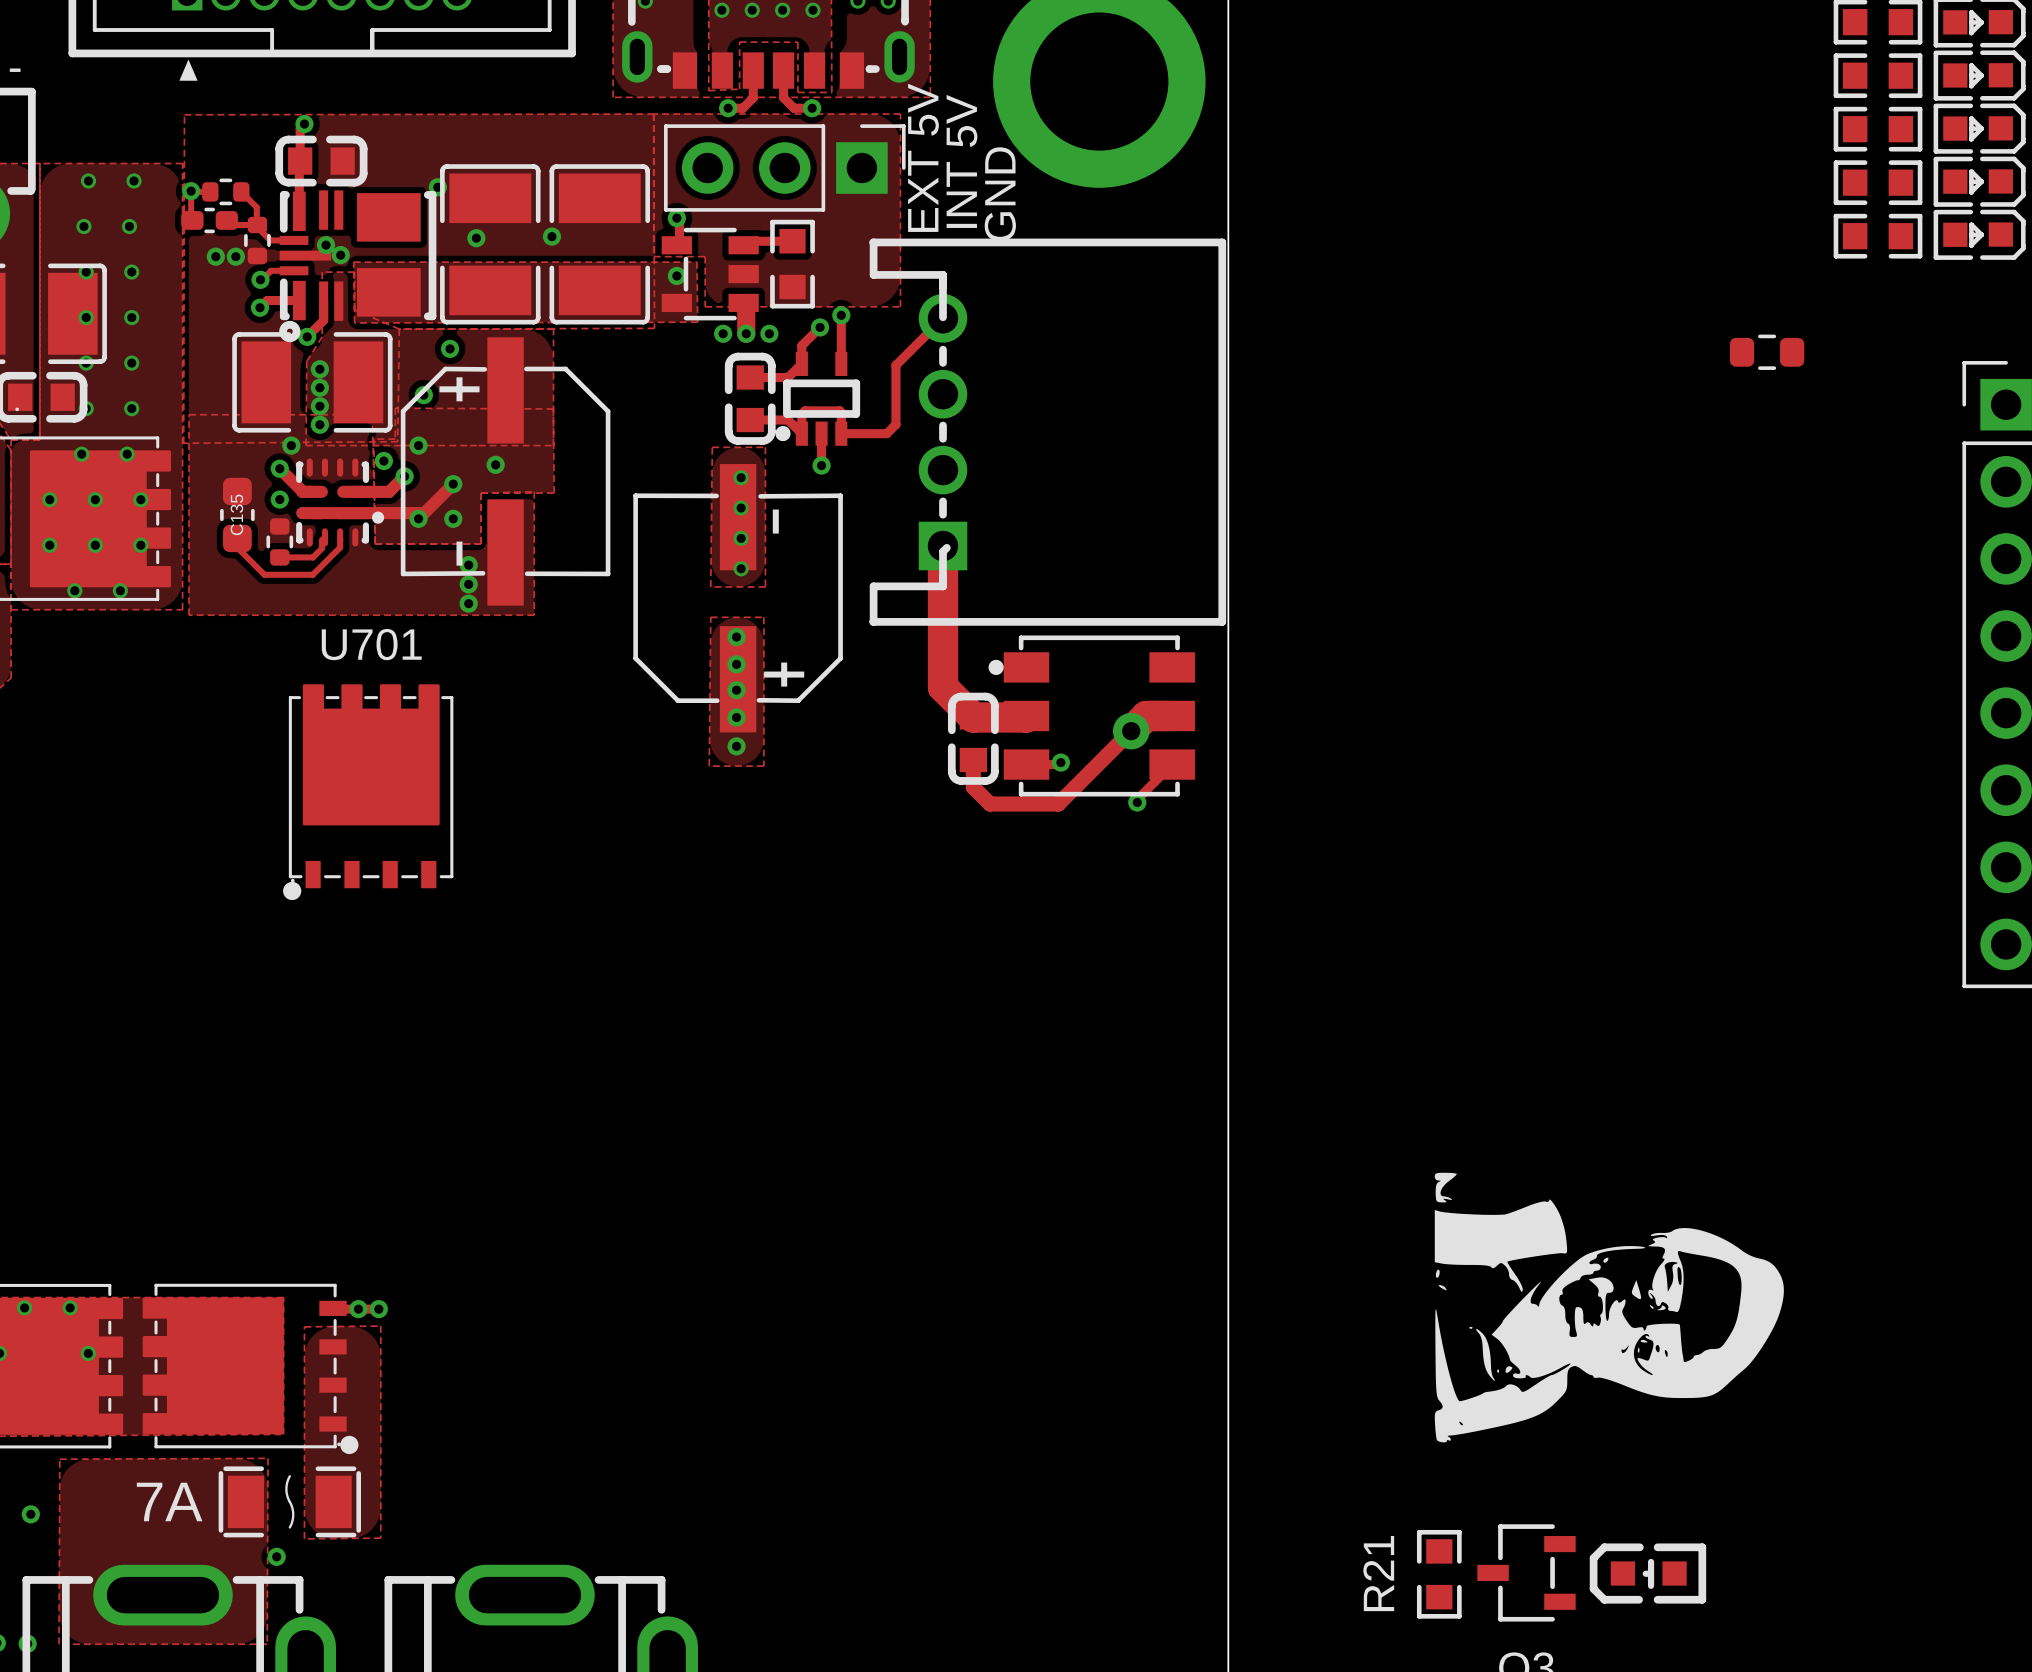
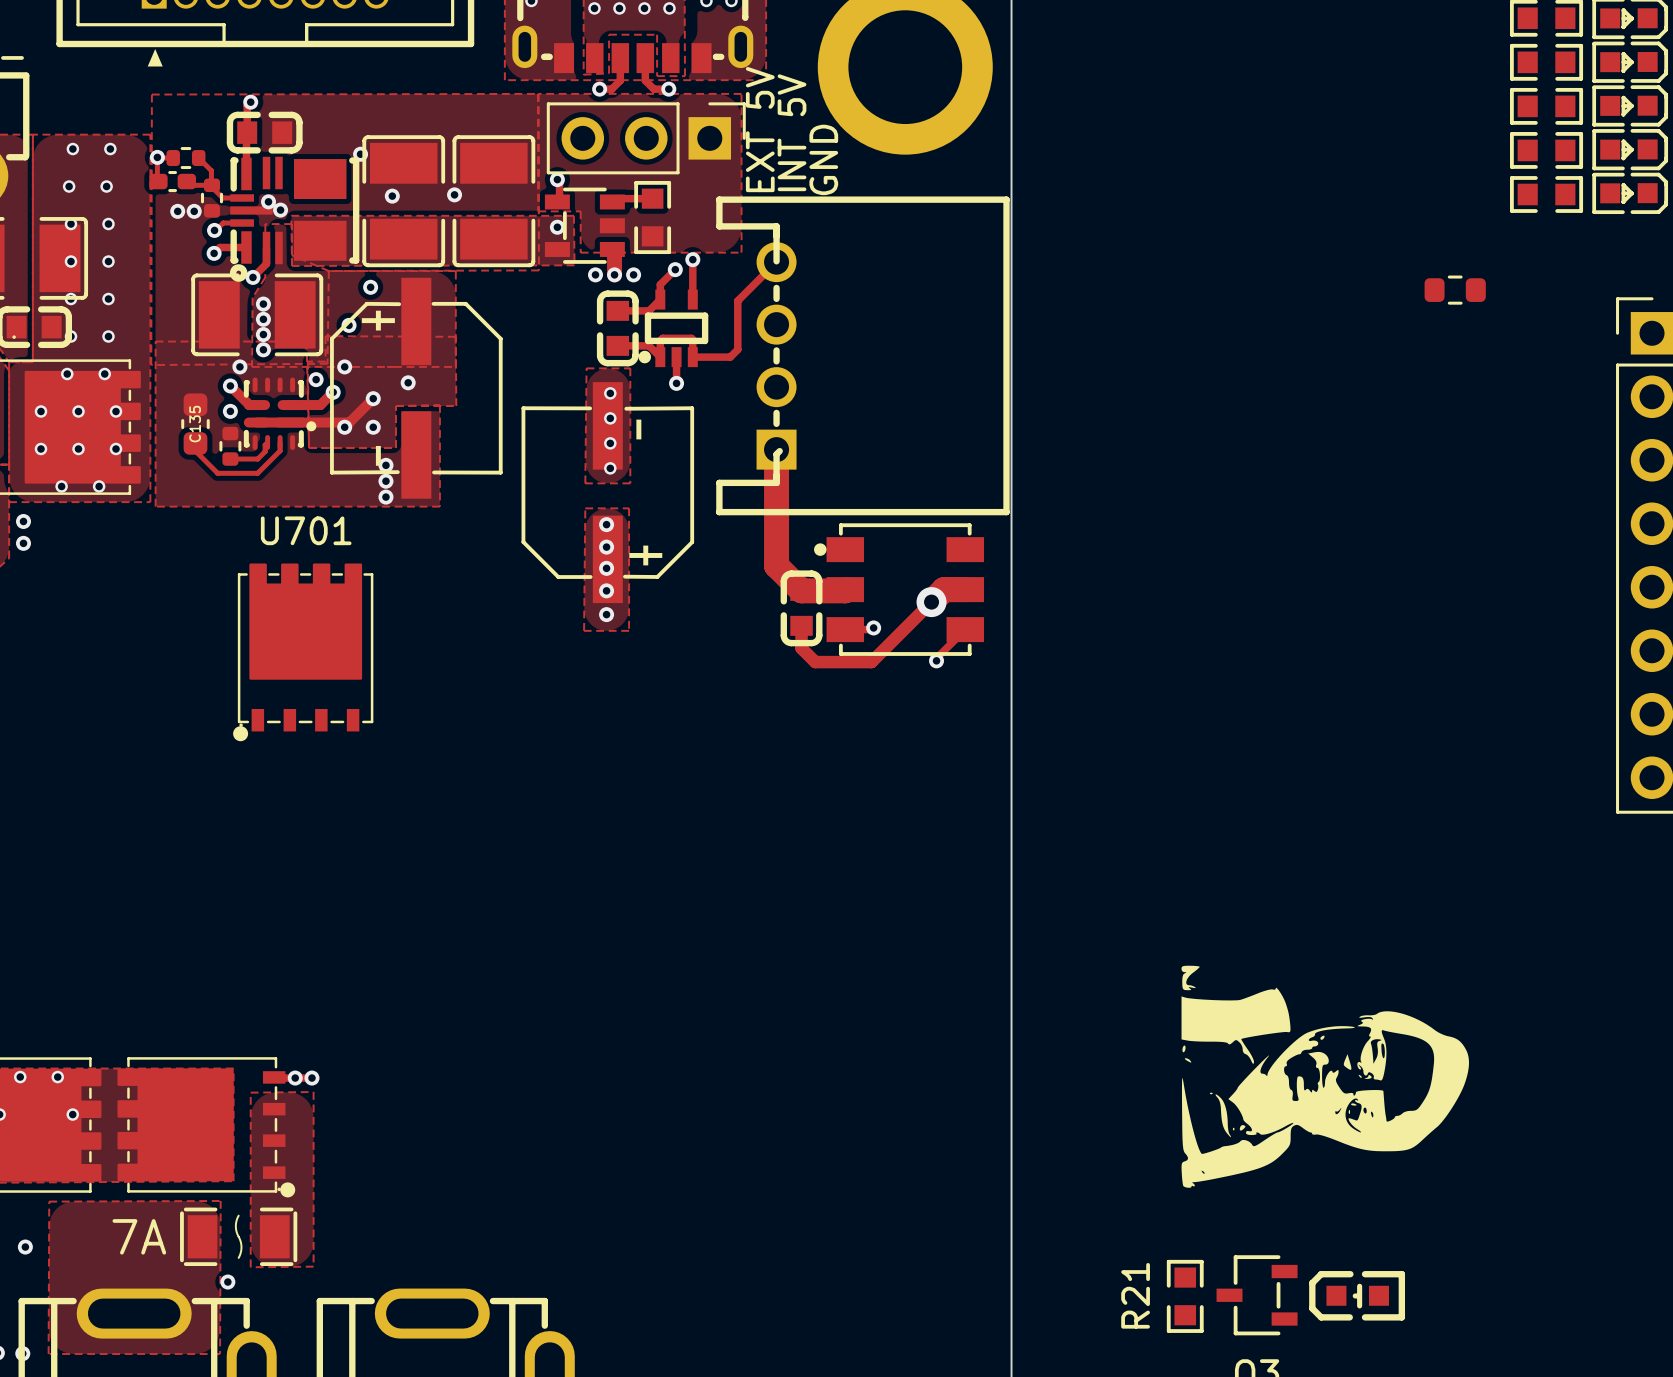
via: none -> (23, 521)
via: none -> (23, 543)

